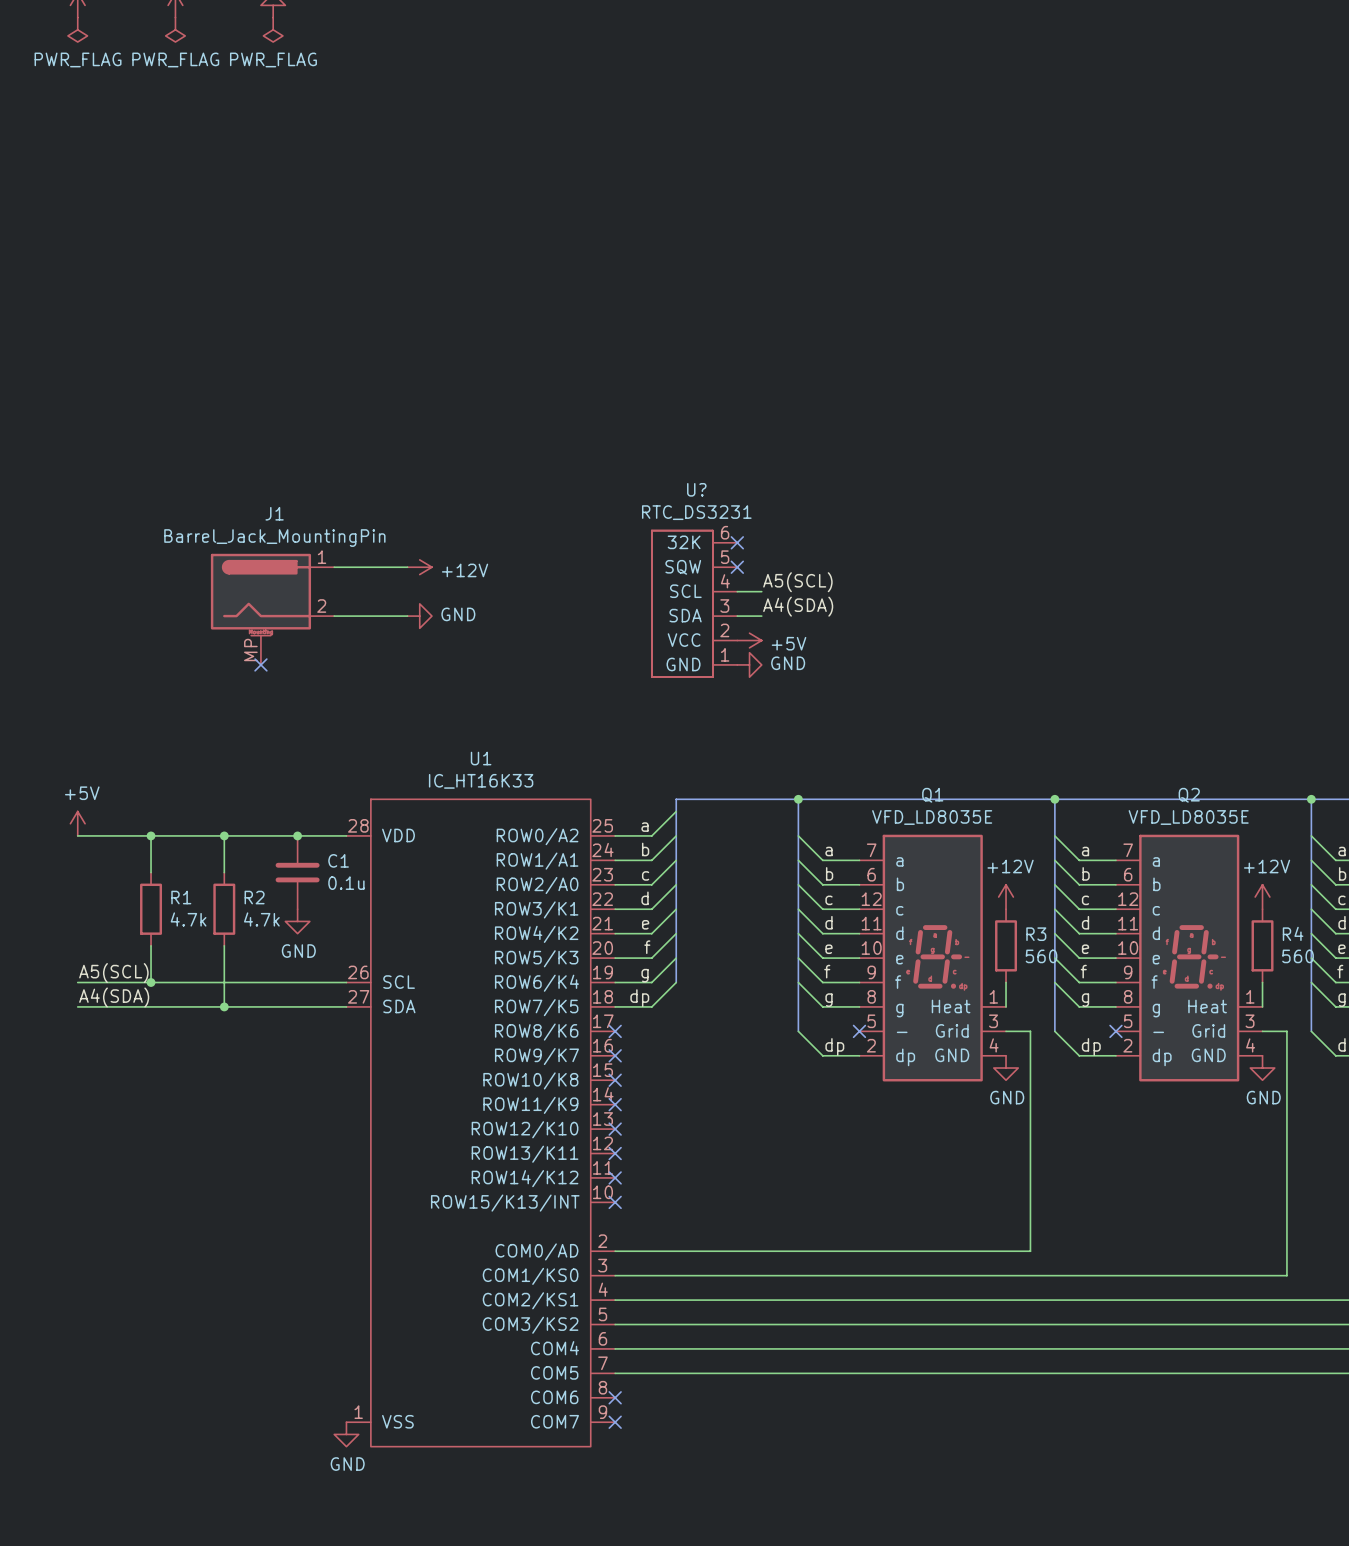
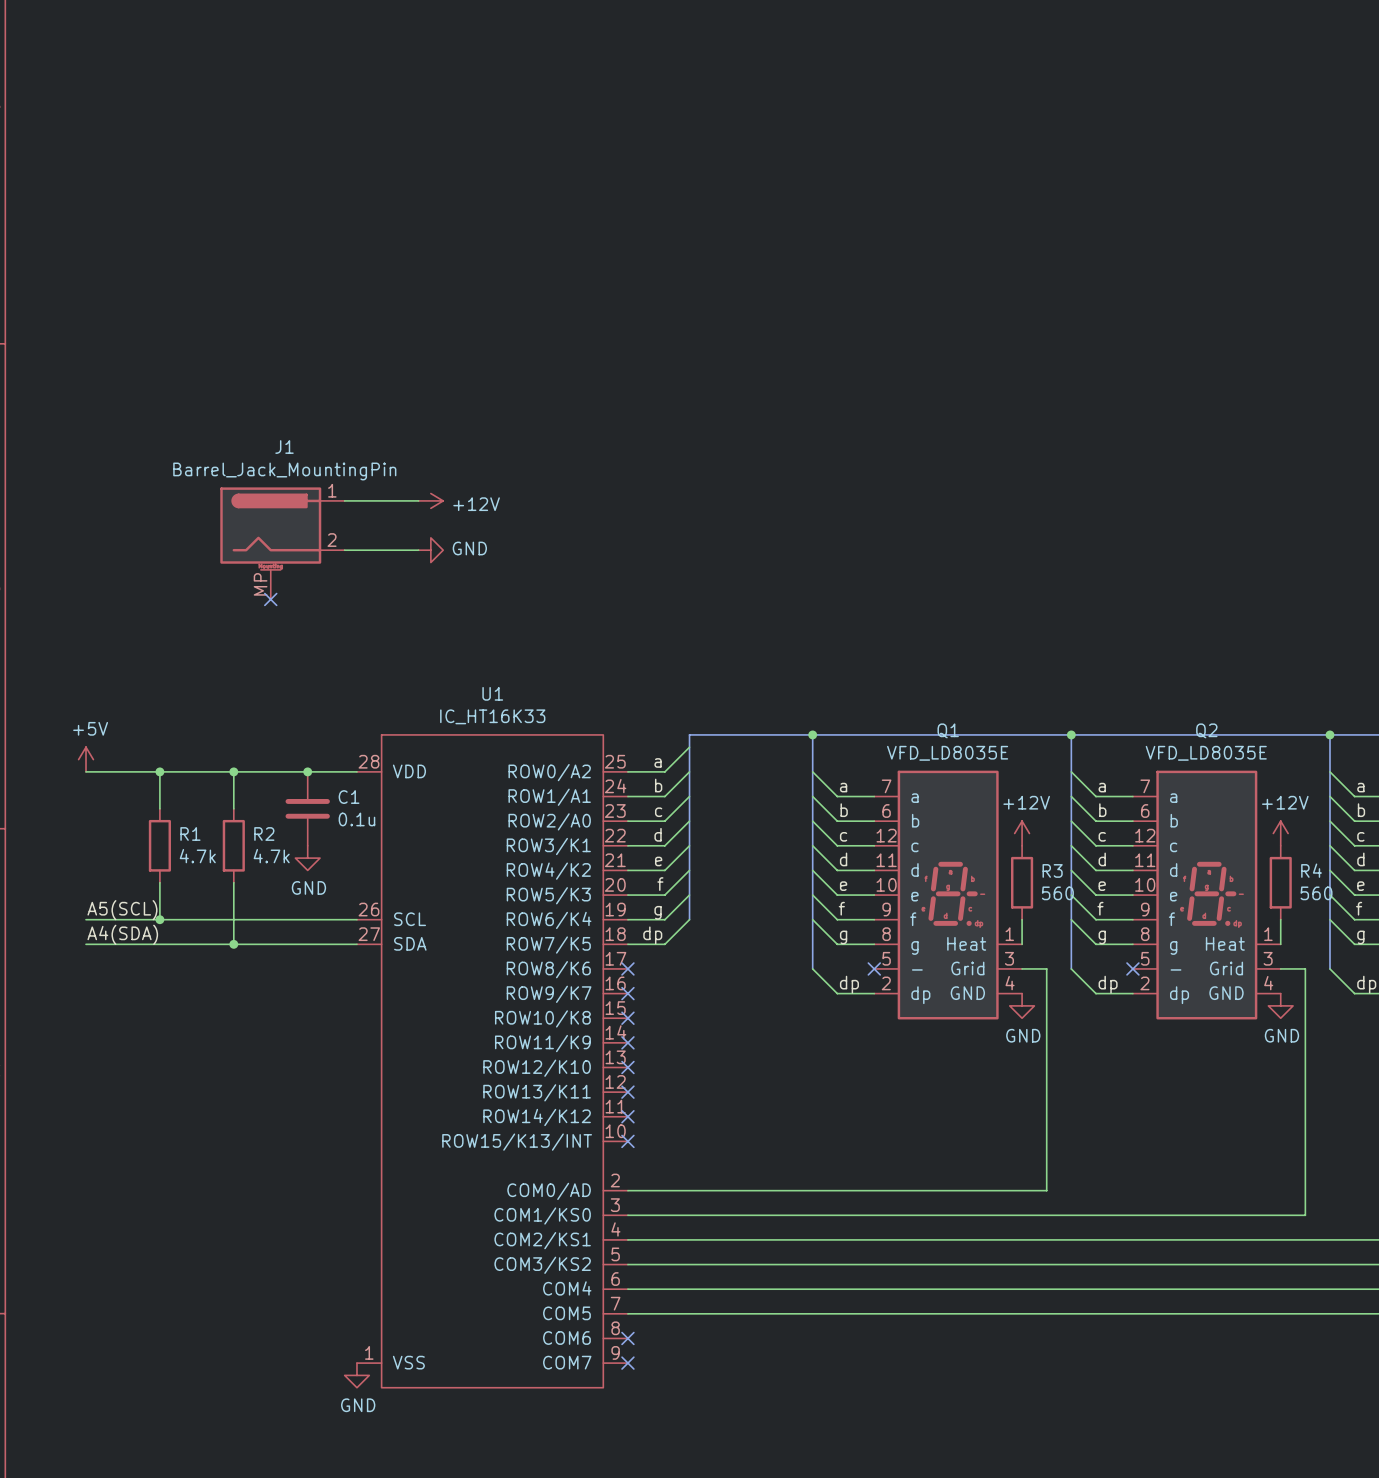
no-connect mark: (737, 542) -> none
no-connect mark: (737, 567) -> none
label: A5(SCL) (797, 582) -> none
wire: (737, 591) (761, 591) -> none
U?: RTC_DS3231 (694, 603) -> none
label: A4(SDA) (798, 606) -> none
wire: (737, 616) (761, 616) -> none
power symbol: +5V (749, 640) -> none
power symbol: GND (749, 664) -> none

